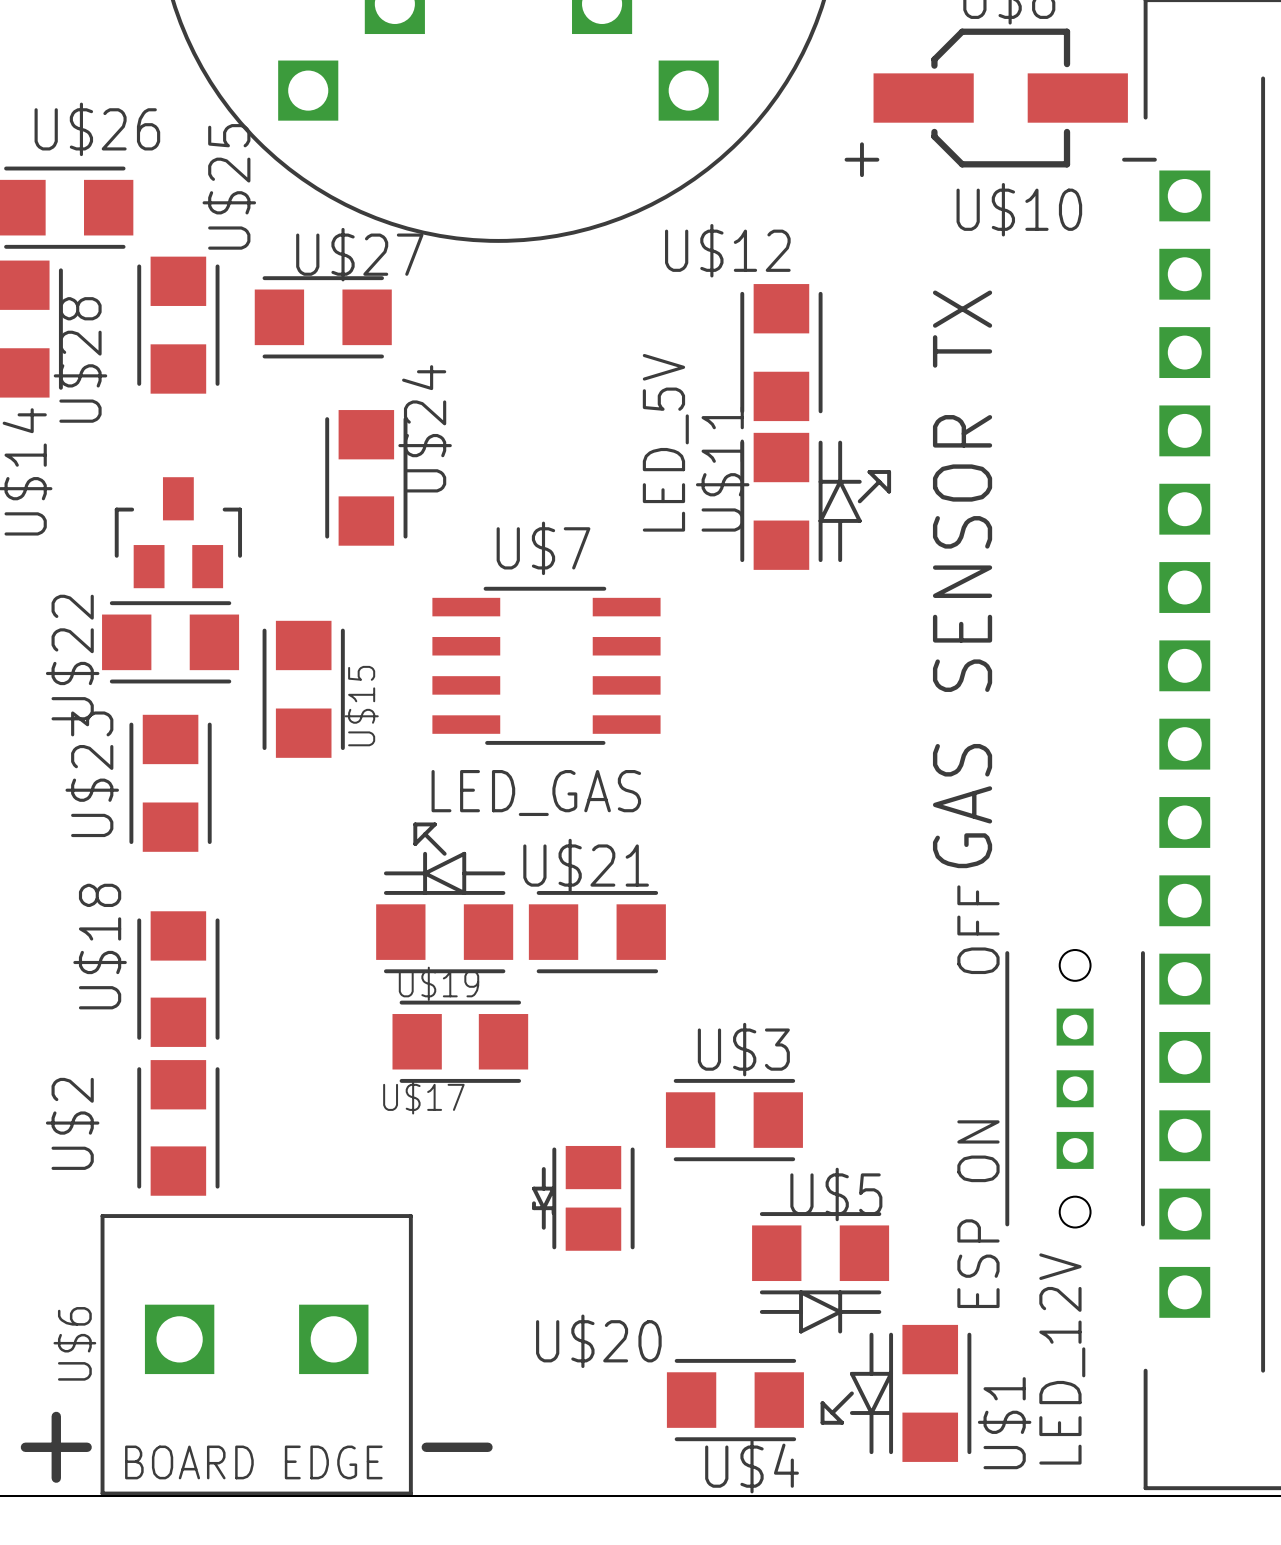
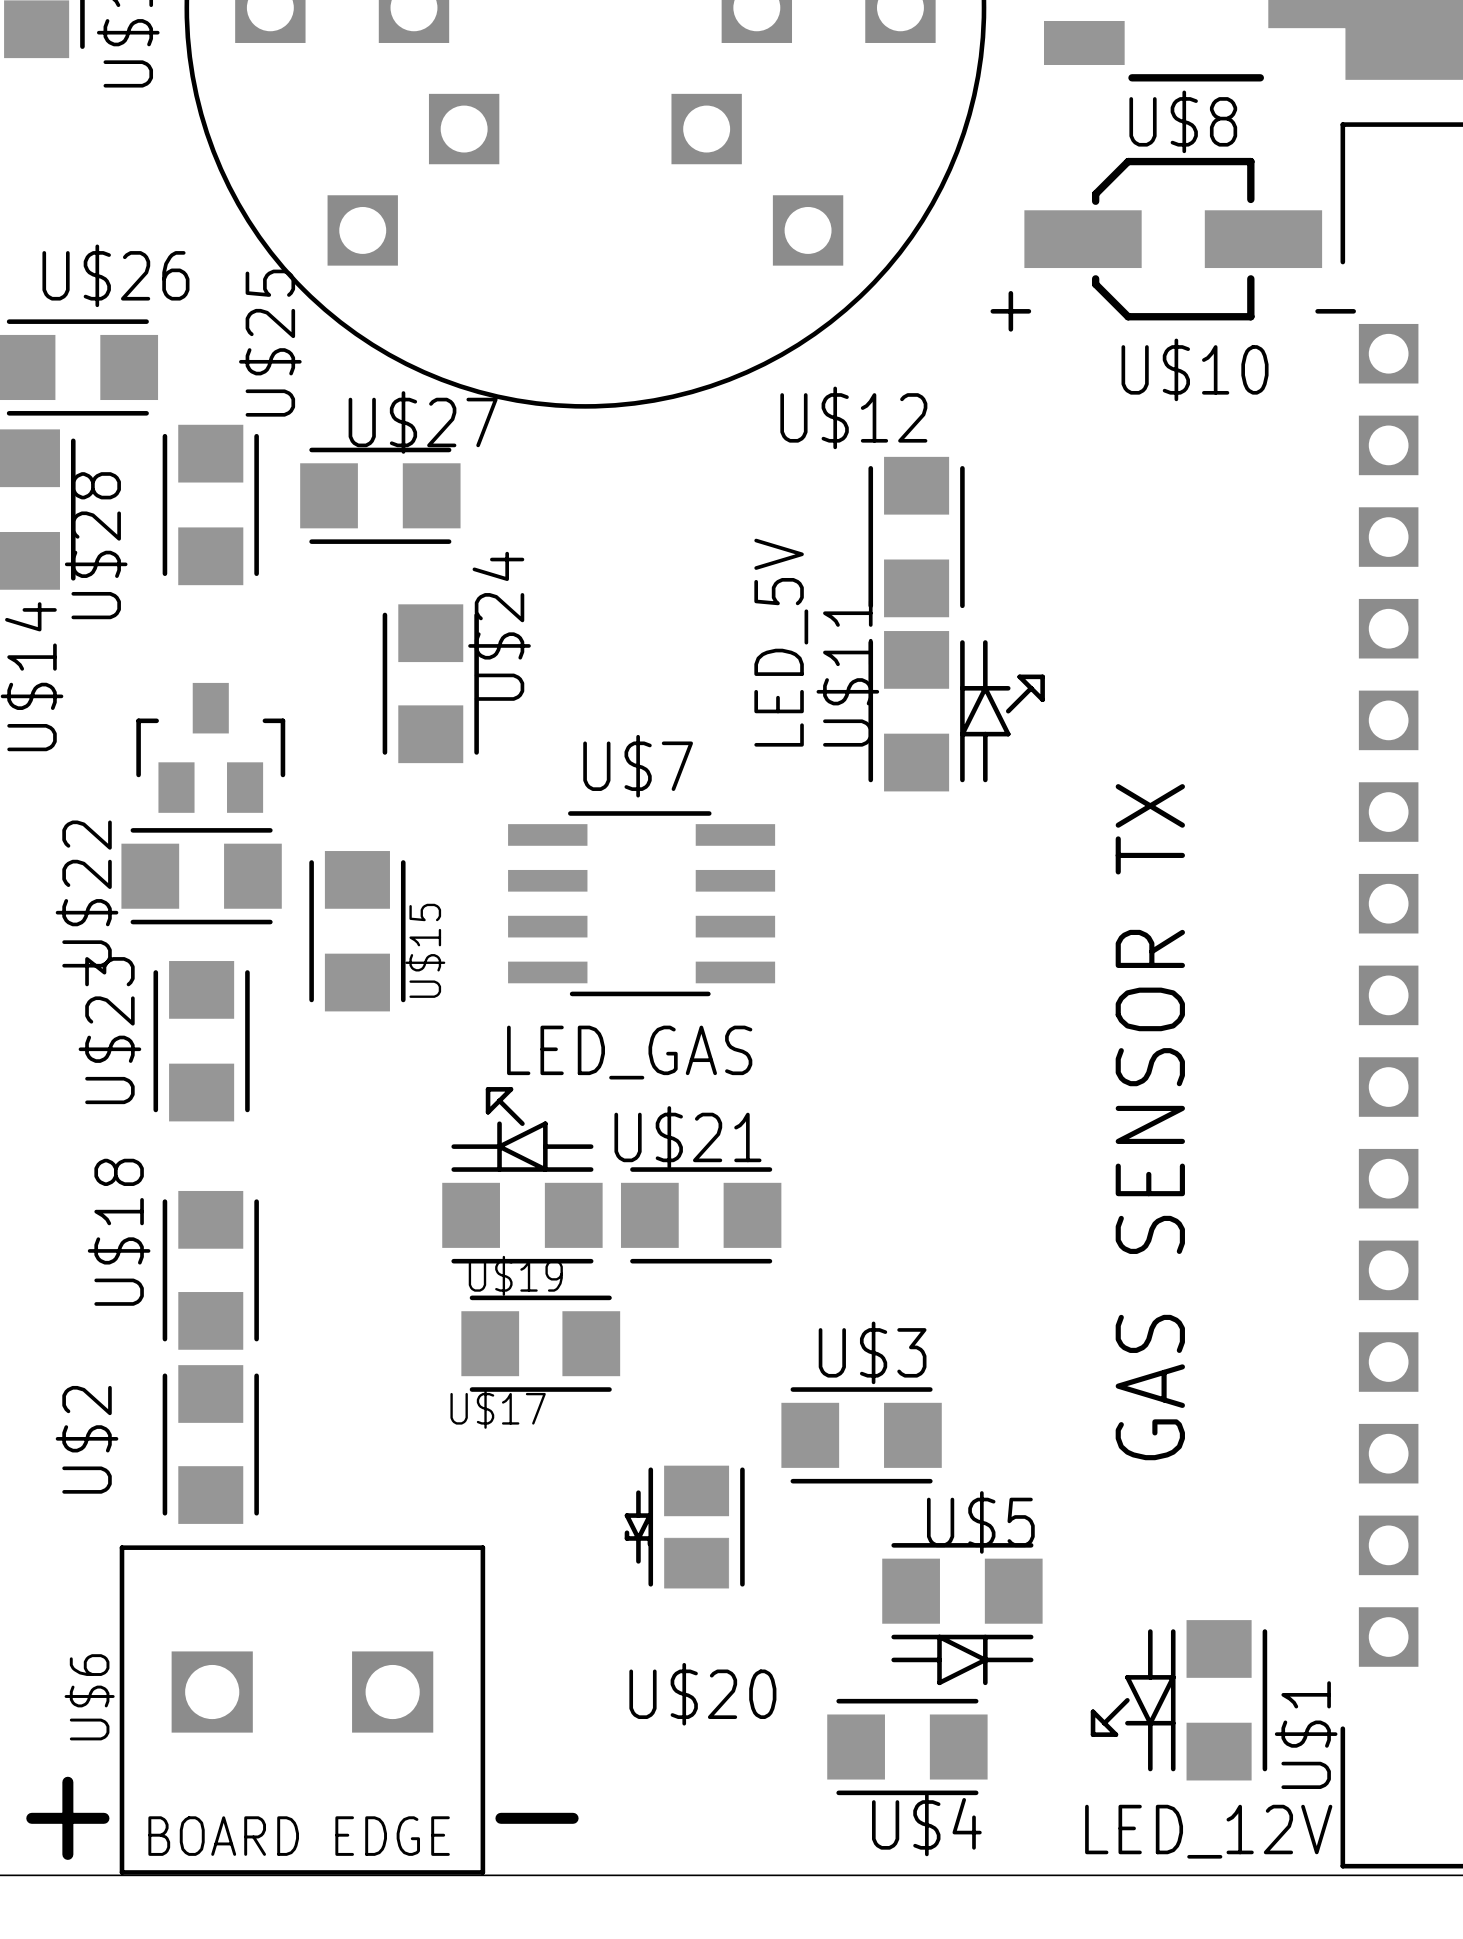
text position: GAS SENSOR TX (962, 579) -> GAS SENSOR TX (1150, 1122)
part: (1075, 1088) -> none
text rotation: 0° (1062, 1358) -> 90° clockwise (1208, 1831)
U$1 position: (895, 1393) -> (1178, 1700)
U$4 position: (735, 1400) -> (907, 1747)

